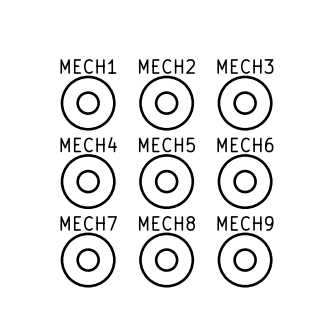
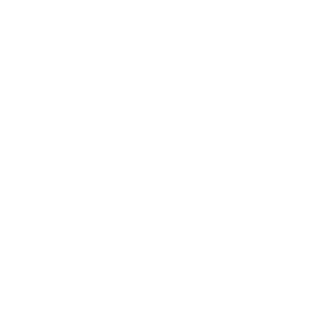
MECH1: (88, 103) -> none
MECH2: (166, 103) -> none
MECH3: (245, 103) -> none
MECH4: (88, 181) -> none
MECH5: (166, 181) -> none
MECH6: (245, 181) -> none
MECH7: (88, 260) -> none
MECH8: (166, 260) -> none
MECH9: (245, 260) -> none

